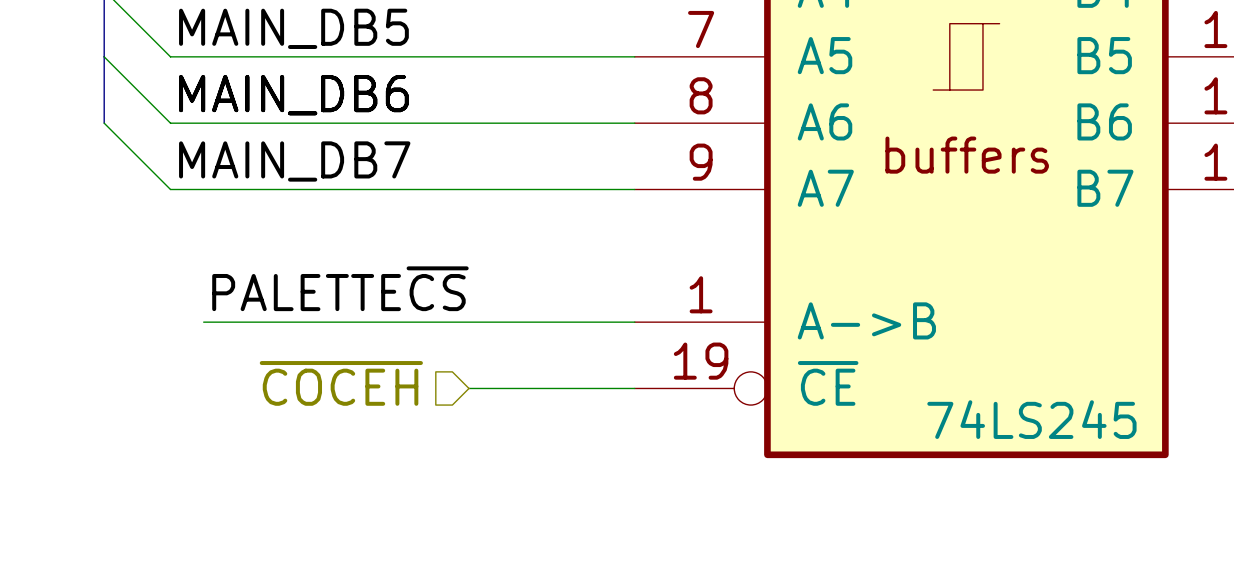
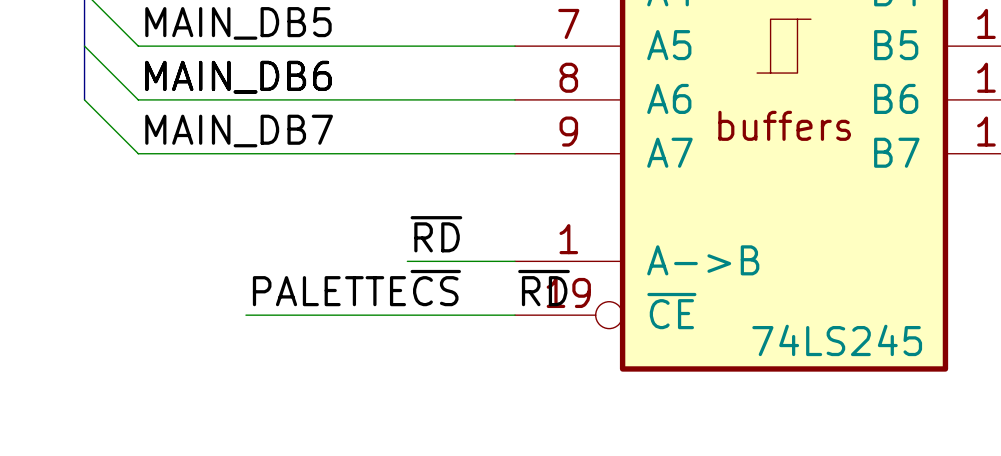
label position: PALETTE~{CS} (340, 288) -> PALETTE~{CS} (356, 288)
label: none -> ~{RD} (436, 234)
wire: (203, 322) (502, 322) -> none
label: none -> ~{RD} (544, 288)
hierarchical label: ~{COCEH} (341, 383) -> none
wire: none -> (245, 315) (380, 315)

